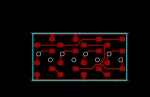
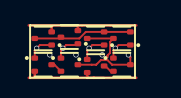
part footprint: [34, 36, 56, 54] -> [31, 25, 62, 52]
part footprint: [57, 36, 79, 54] -> [57, 24, 88, 50]
part footprint: [80, 36, 102, 54] -> [83, 25, 115, 52]
part footprint: [104, 36, 126, 54] -> [110, 25, 141, 52]
part footprint: [34, 60, 56, 77] -> [24, 52, 55, 78]
part footprint: [57, 60, 79, 77] -> [51, 52, 82, 78]
part footprint: [80, 60, 102, 77] -> [77, 53, 108, 79]
part footprint: [104, 60, 126, 77] -> [103, 52, 134, 78]

